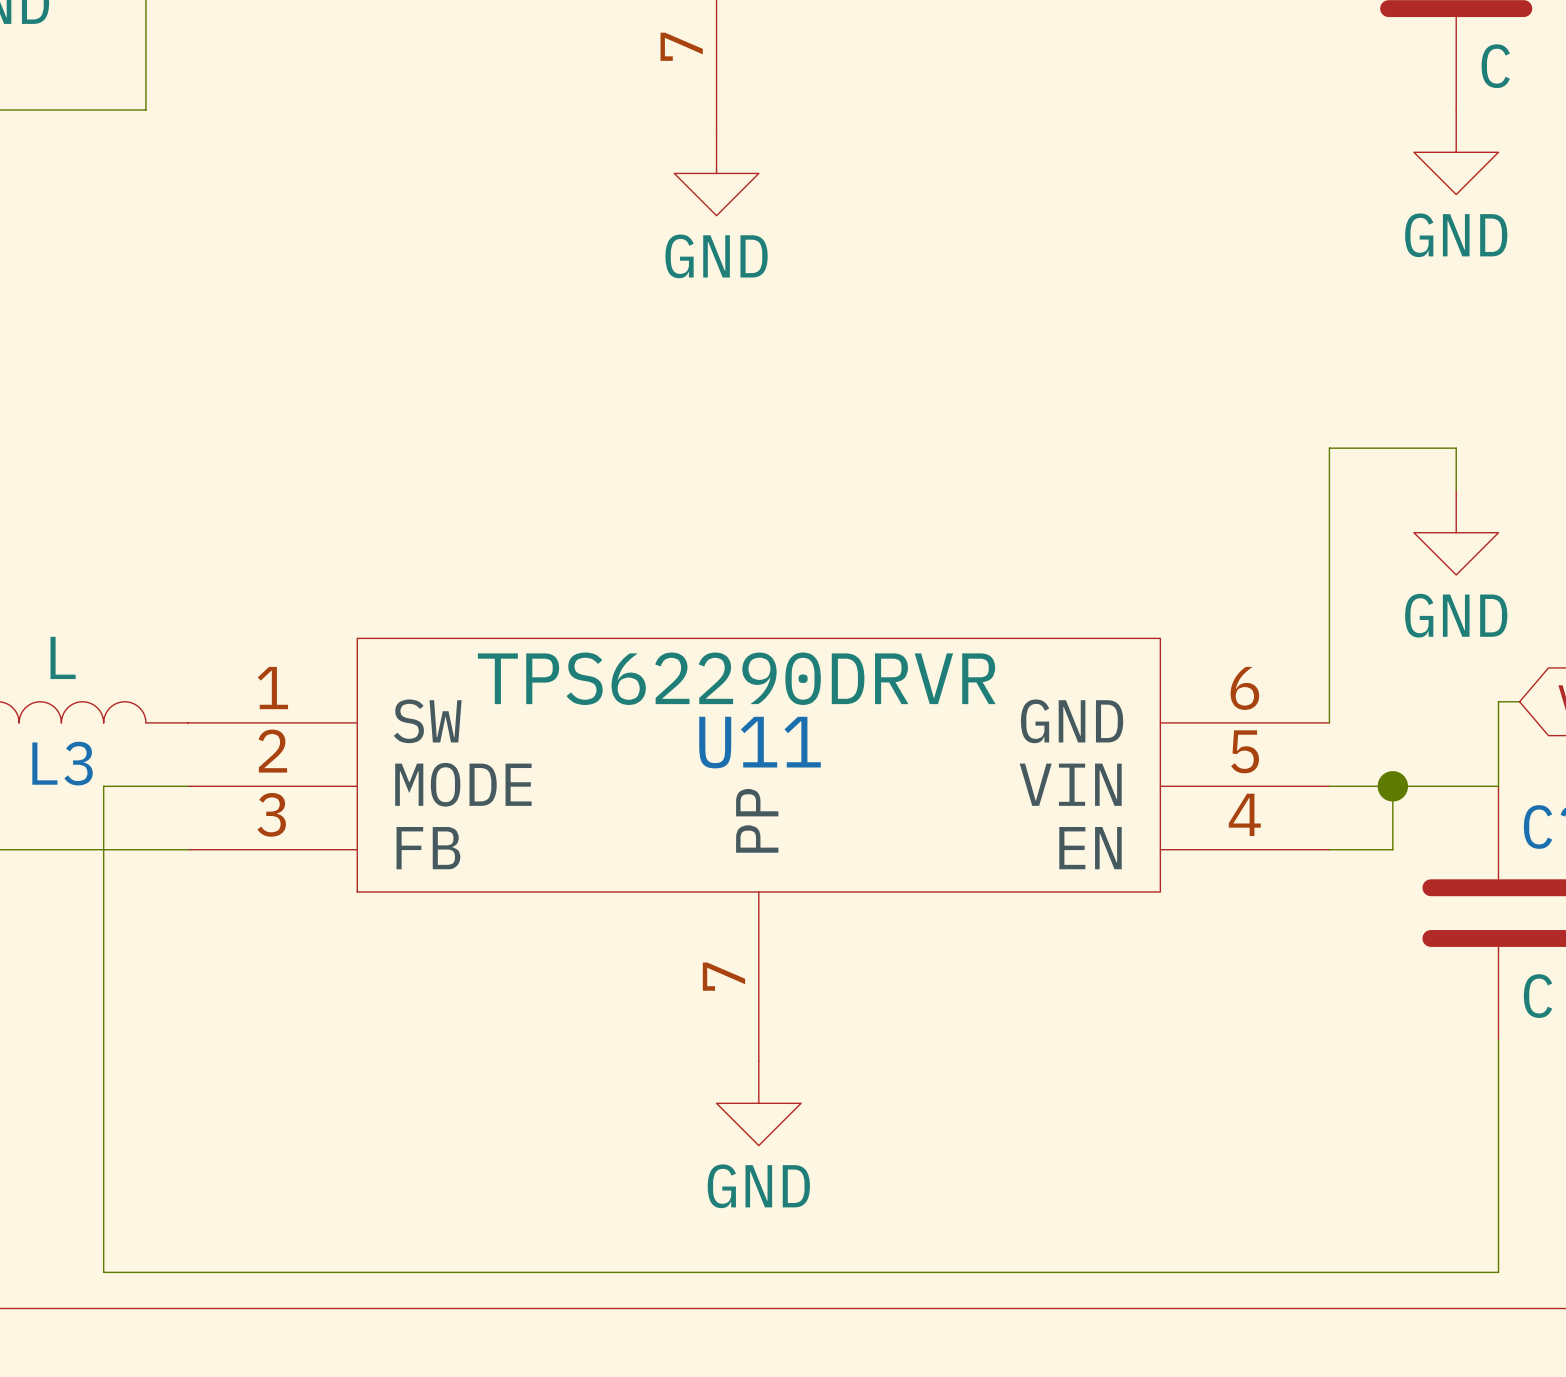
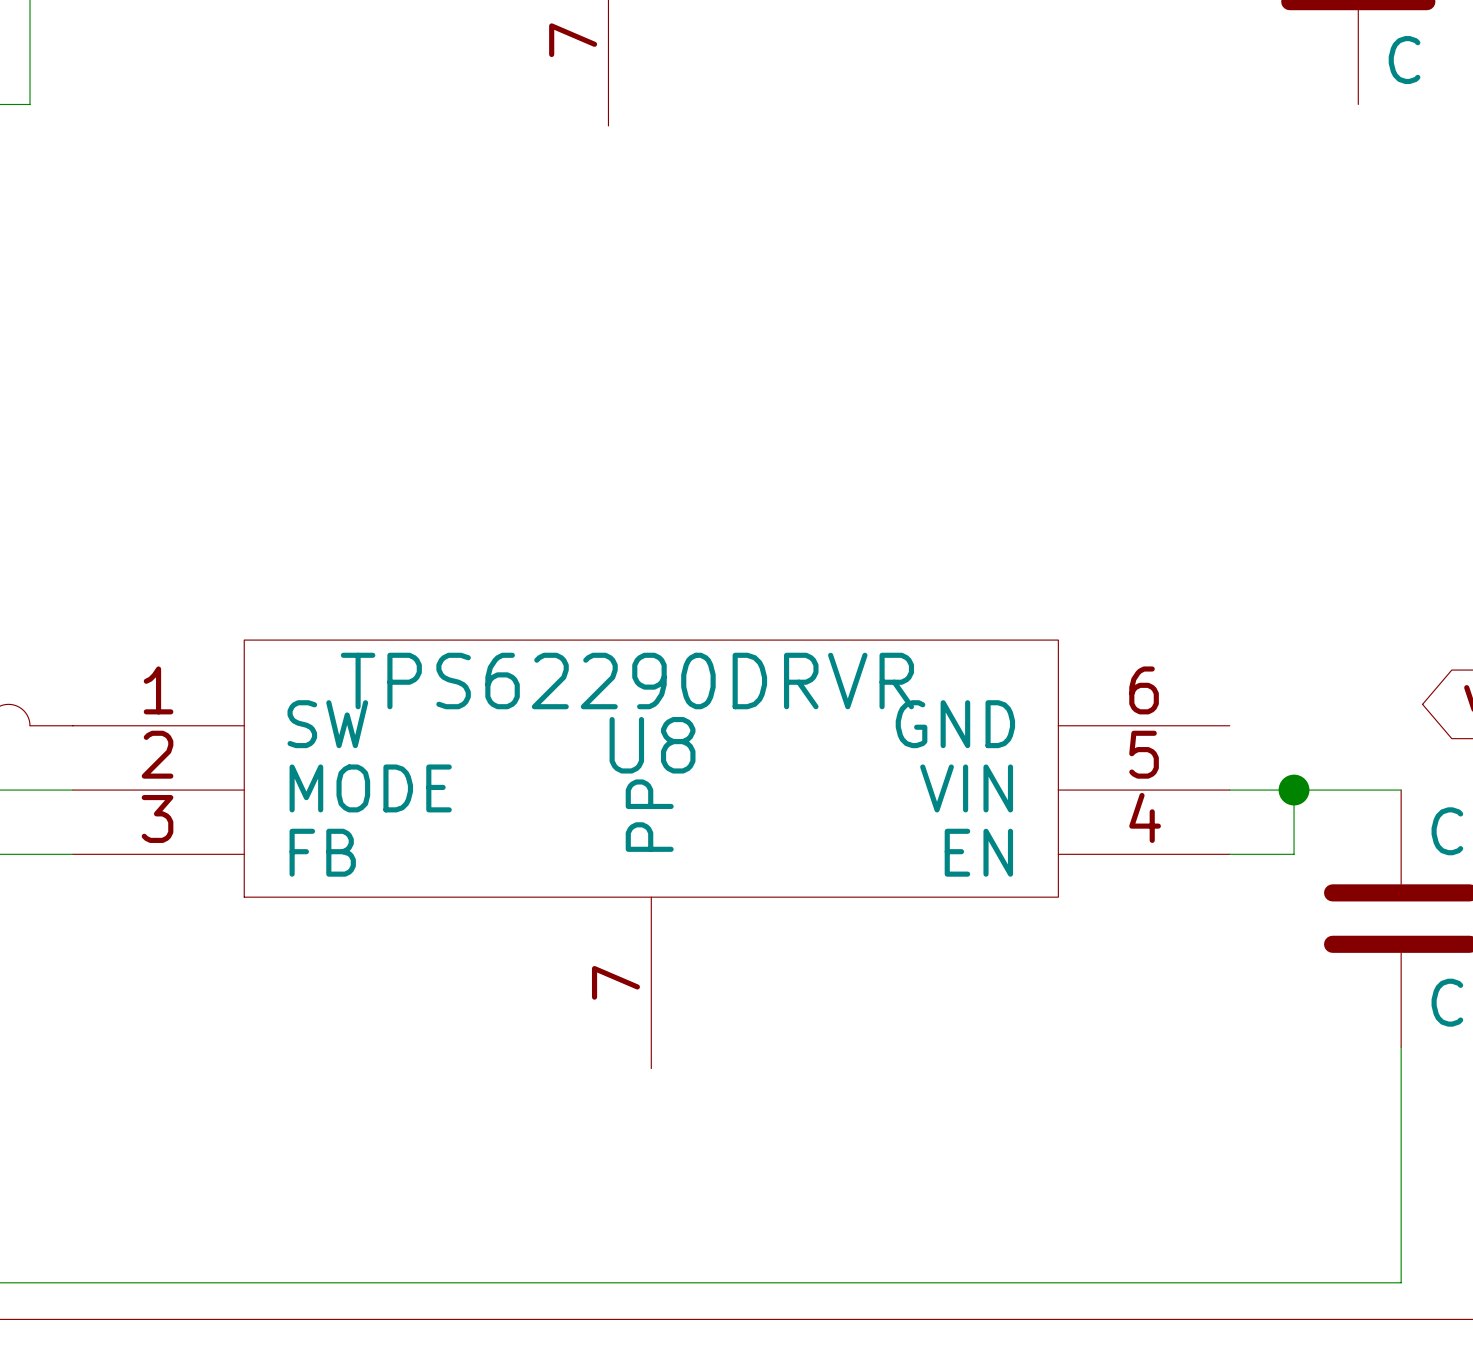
power symbol: GND (1456, 152) -> none
power symbol: GND (716, 173) -> none
wire: (1456, 490) (1456, 448) (1329, 448) (1329, 722) -> none
power symbol: GND (1456, 532) -> none
wire: (1519, 701) (1498, 701) (1498, 786) -> none
U11 name: U11 (760, 742) -> U8 (652, 745)
power symbol: GND (758, 1103) -> none

